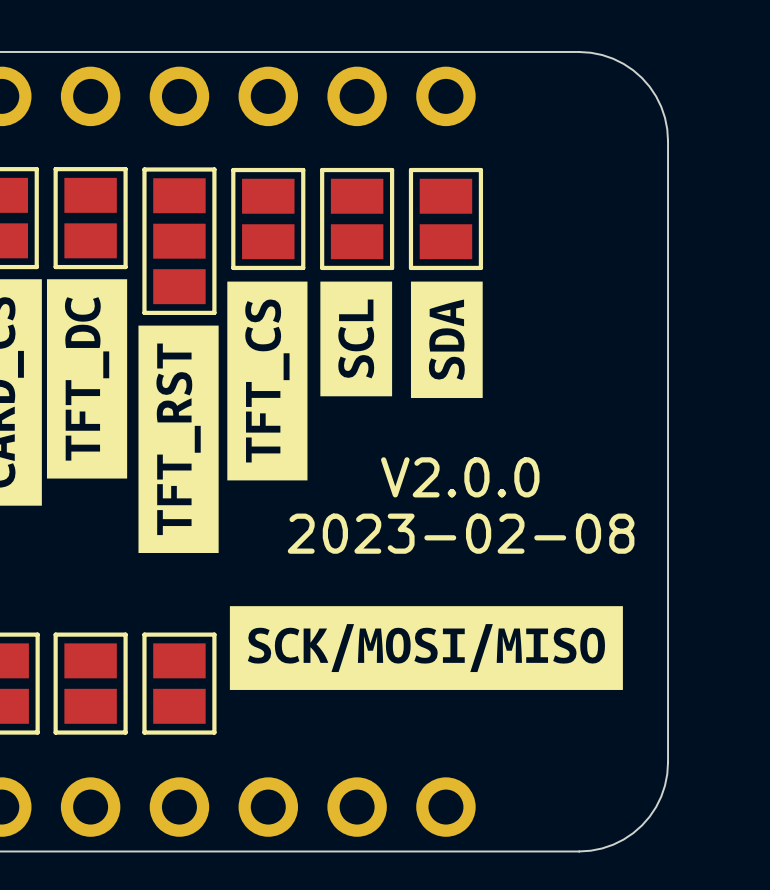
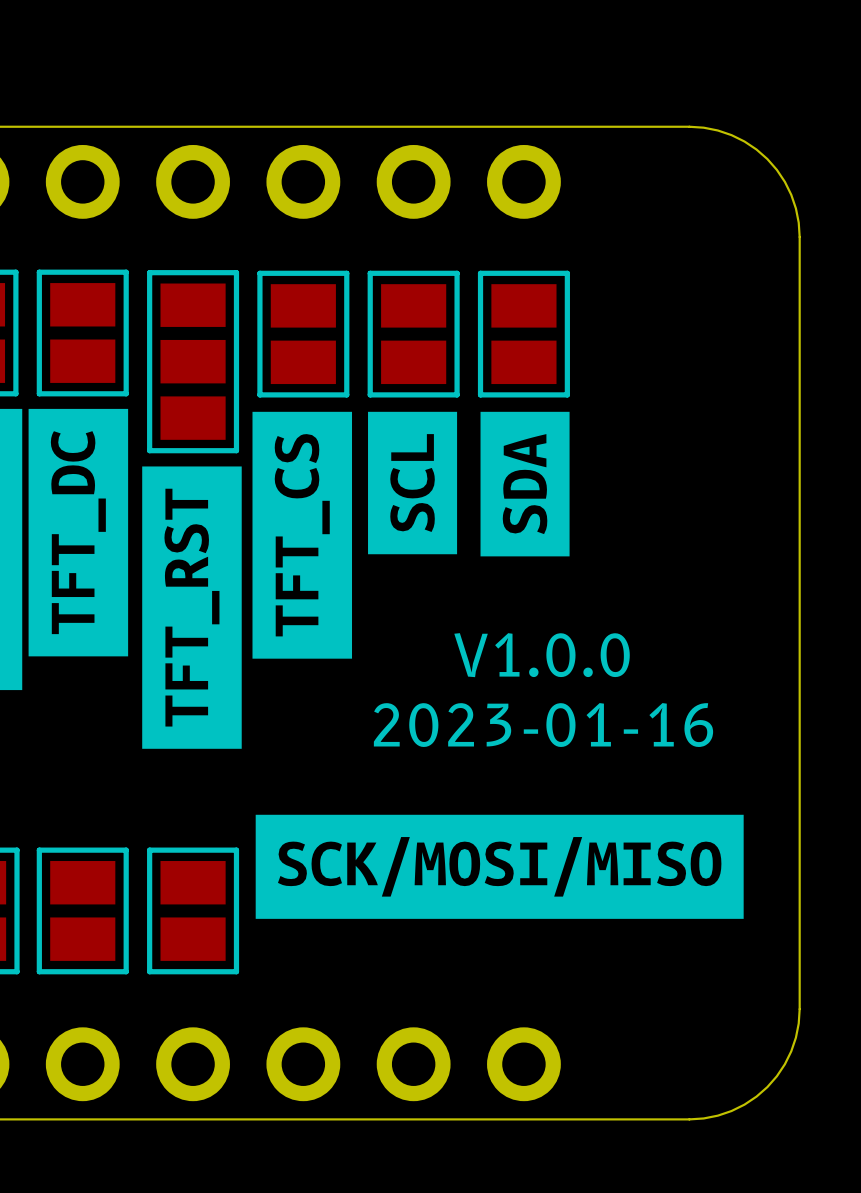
text: V2.0.0 (460, 477) -> V1.0.0 (542, 655)
text: 2023-02-08 (461, 533) -> 2023-01-16 (543, 725)

